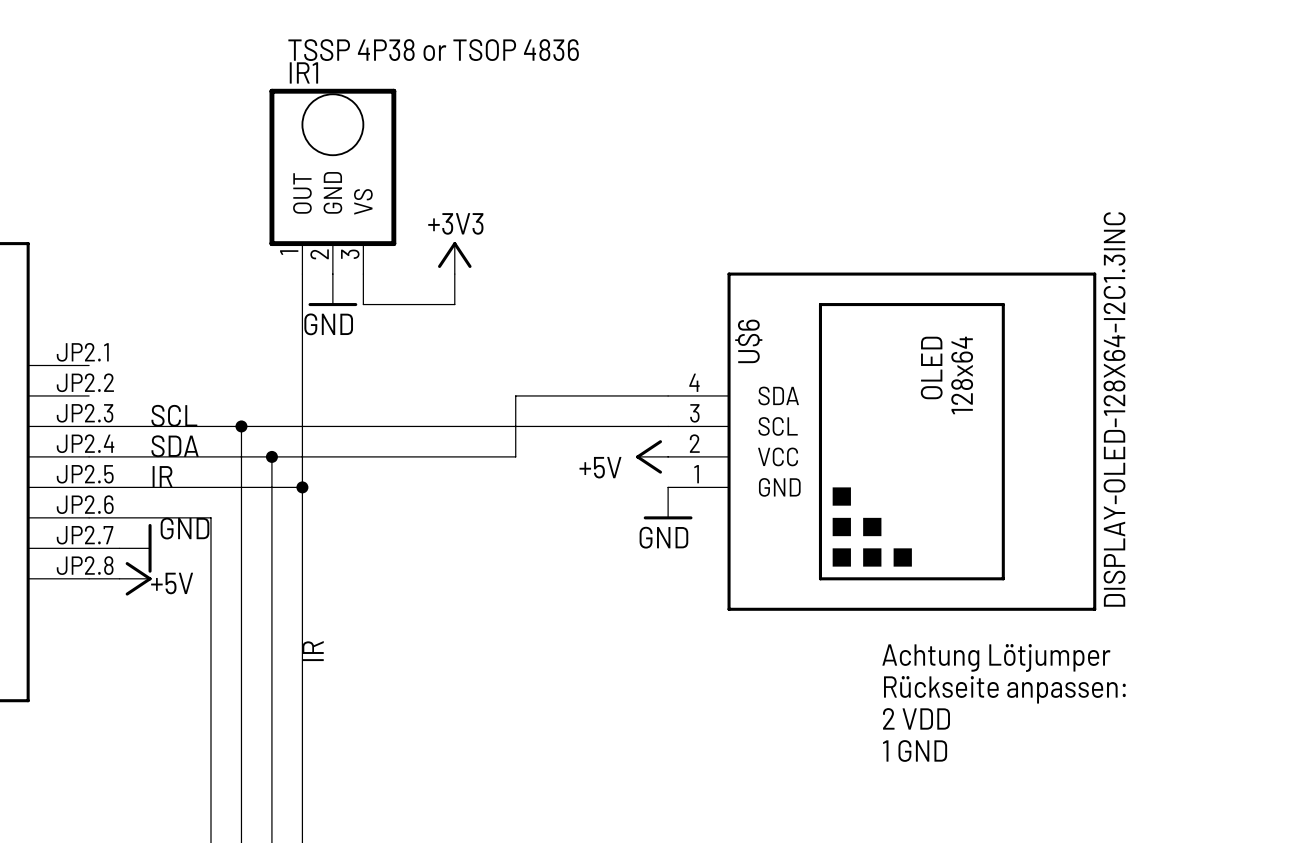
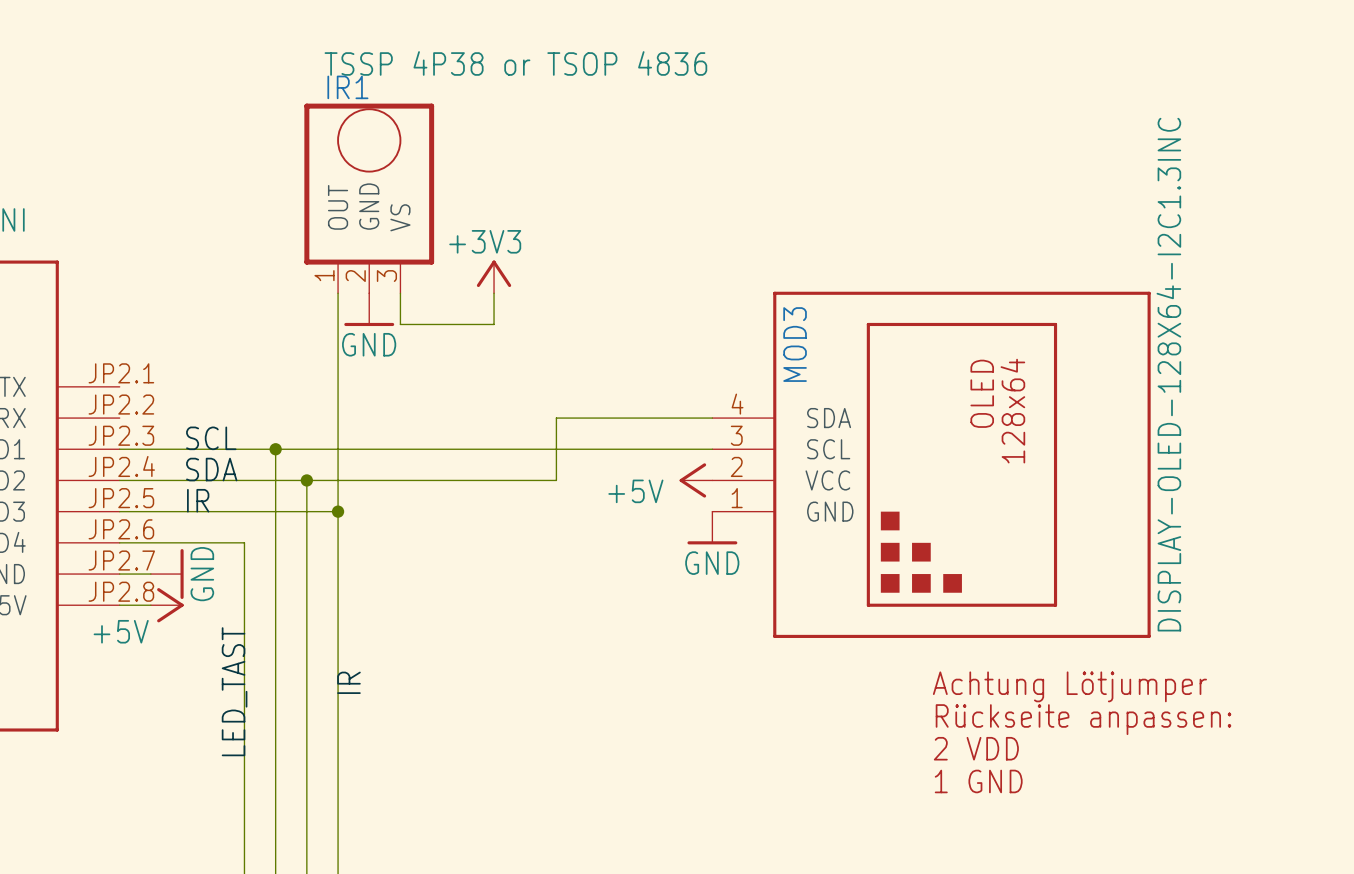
U$6 name: U$6 (748, 341) -> MOD3 (795, 344)
power symbol text rotation: 0° (184, 528) -> 90° counterclockwise (202, 574)
power symbol text position: +5V (172, 583) -> +5V (121, 631)
label: none -> LED_TAST (234, 691)

